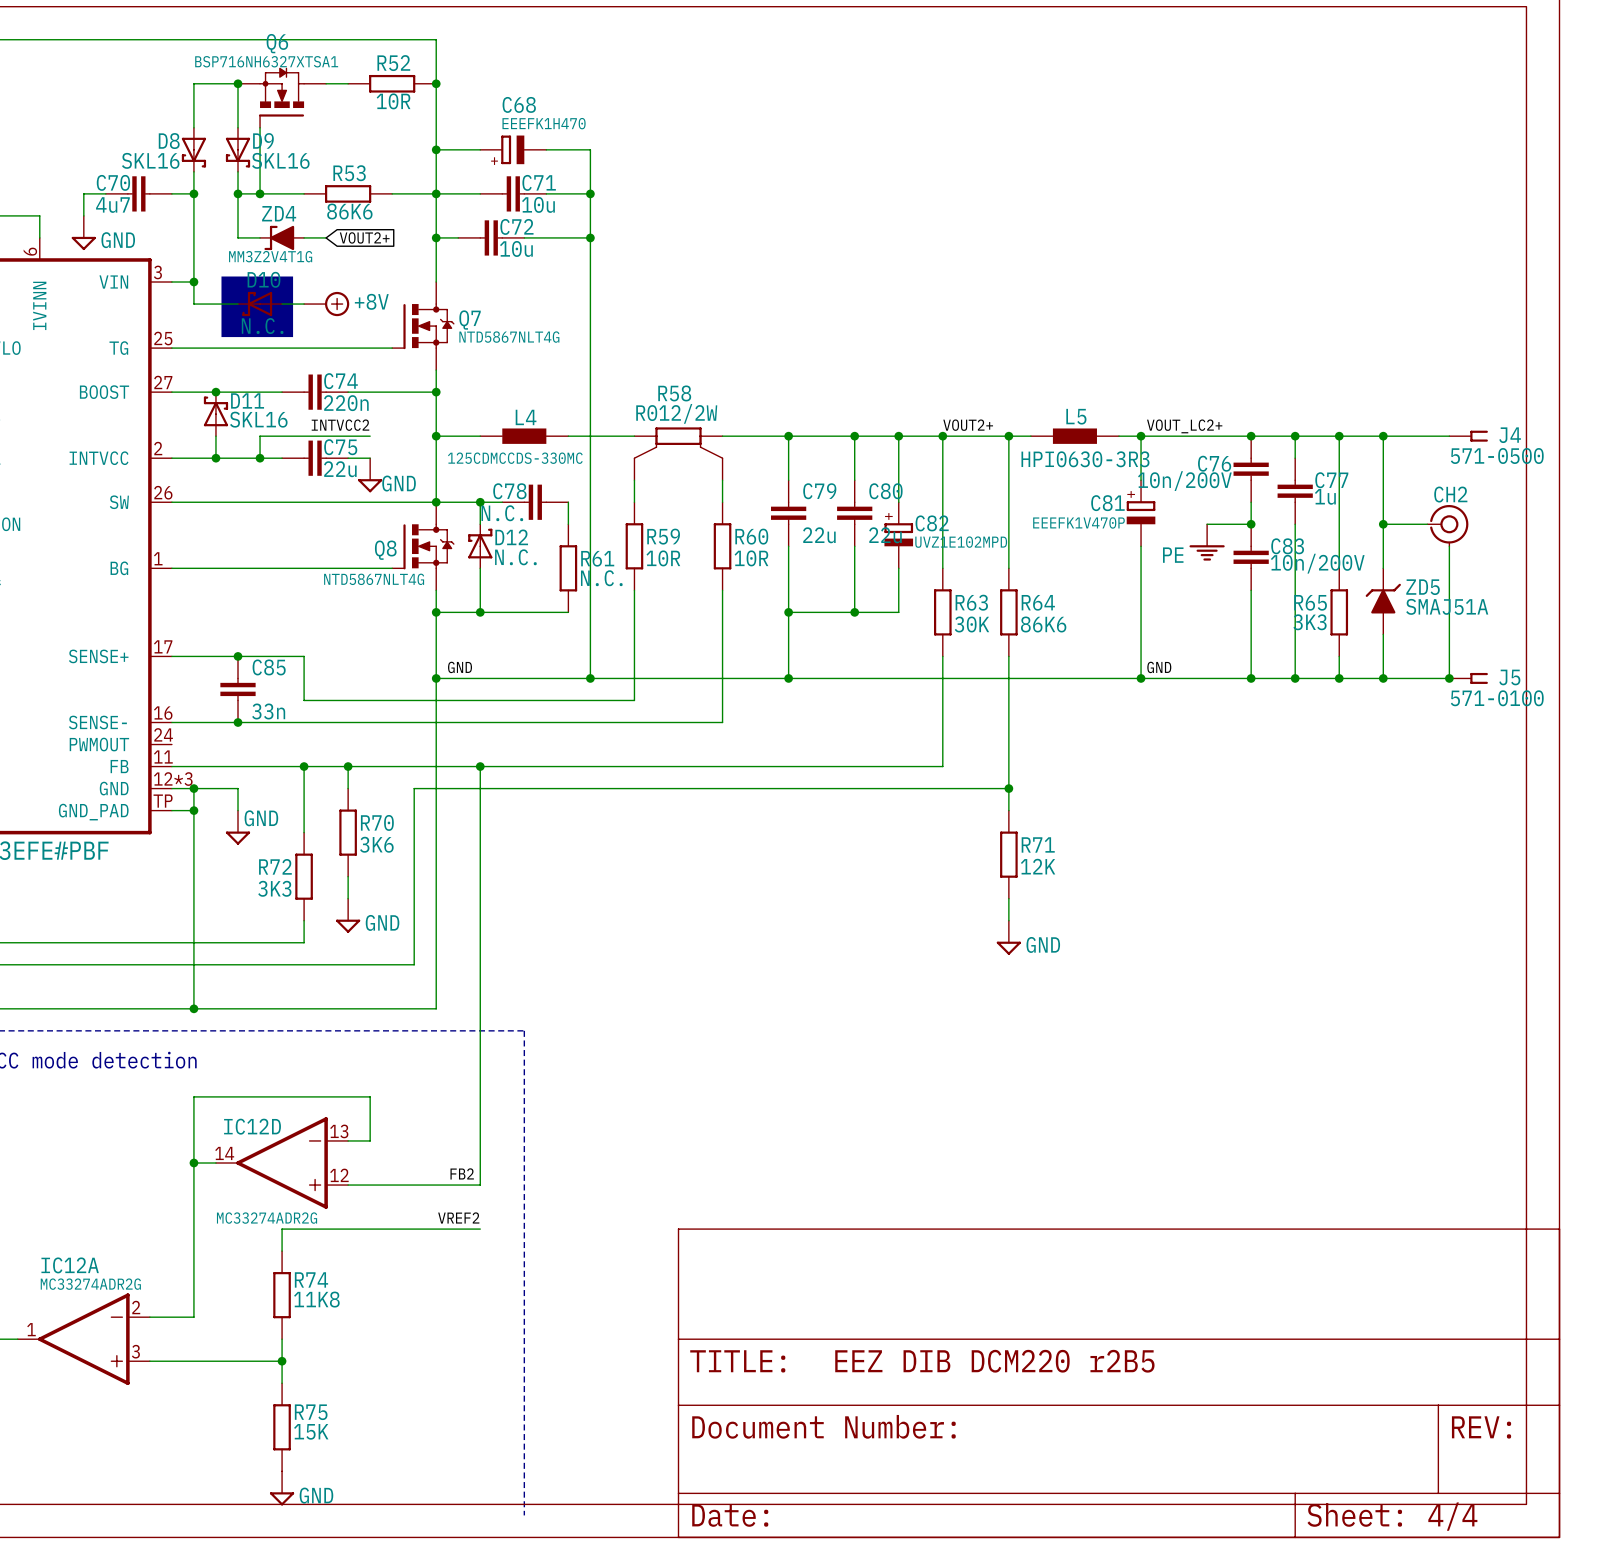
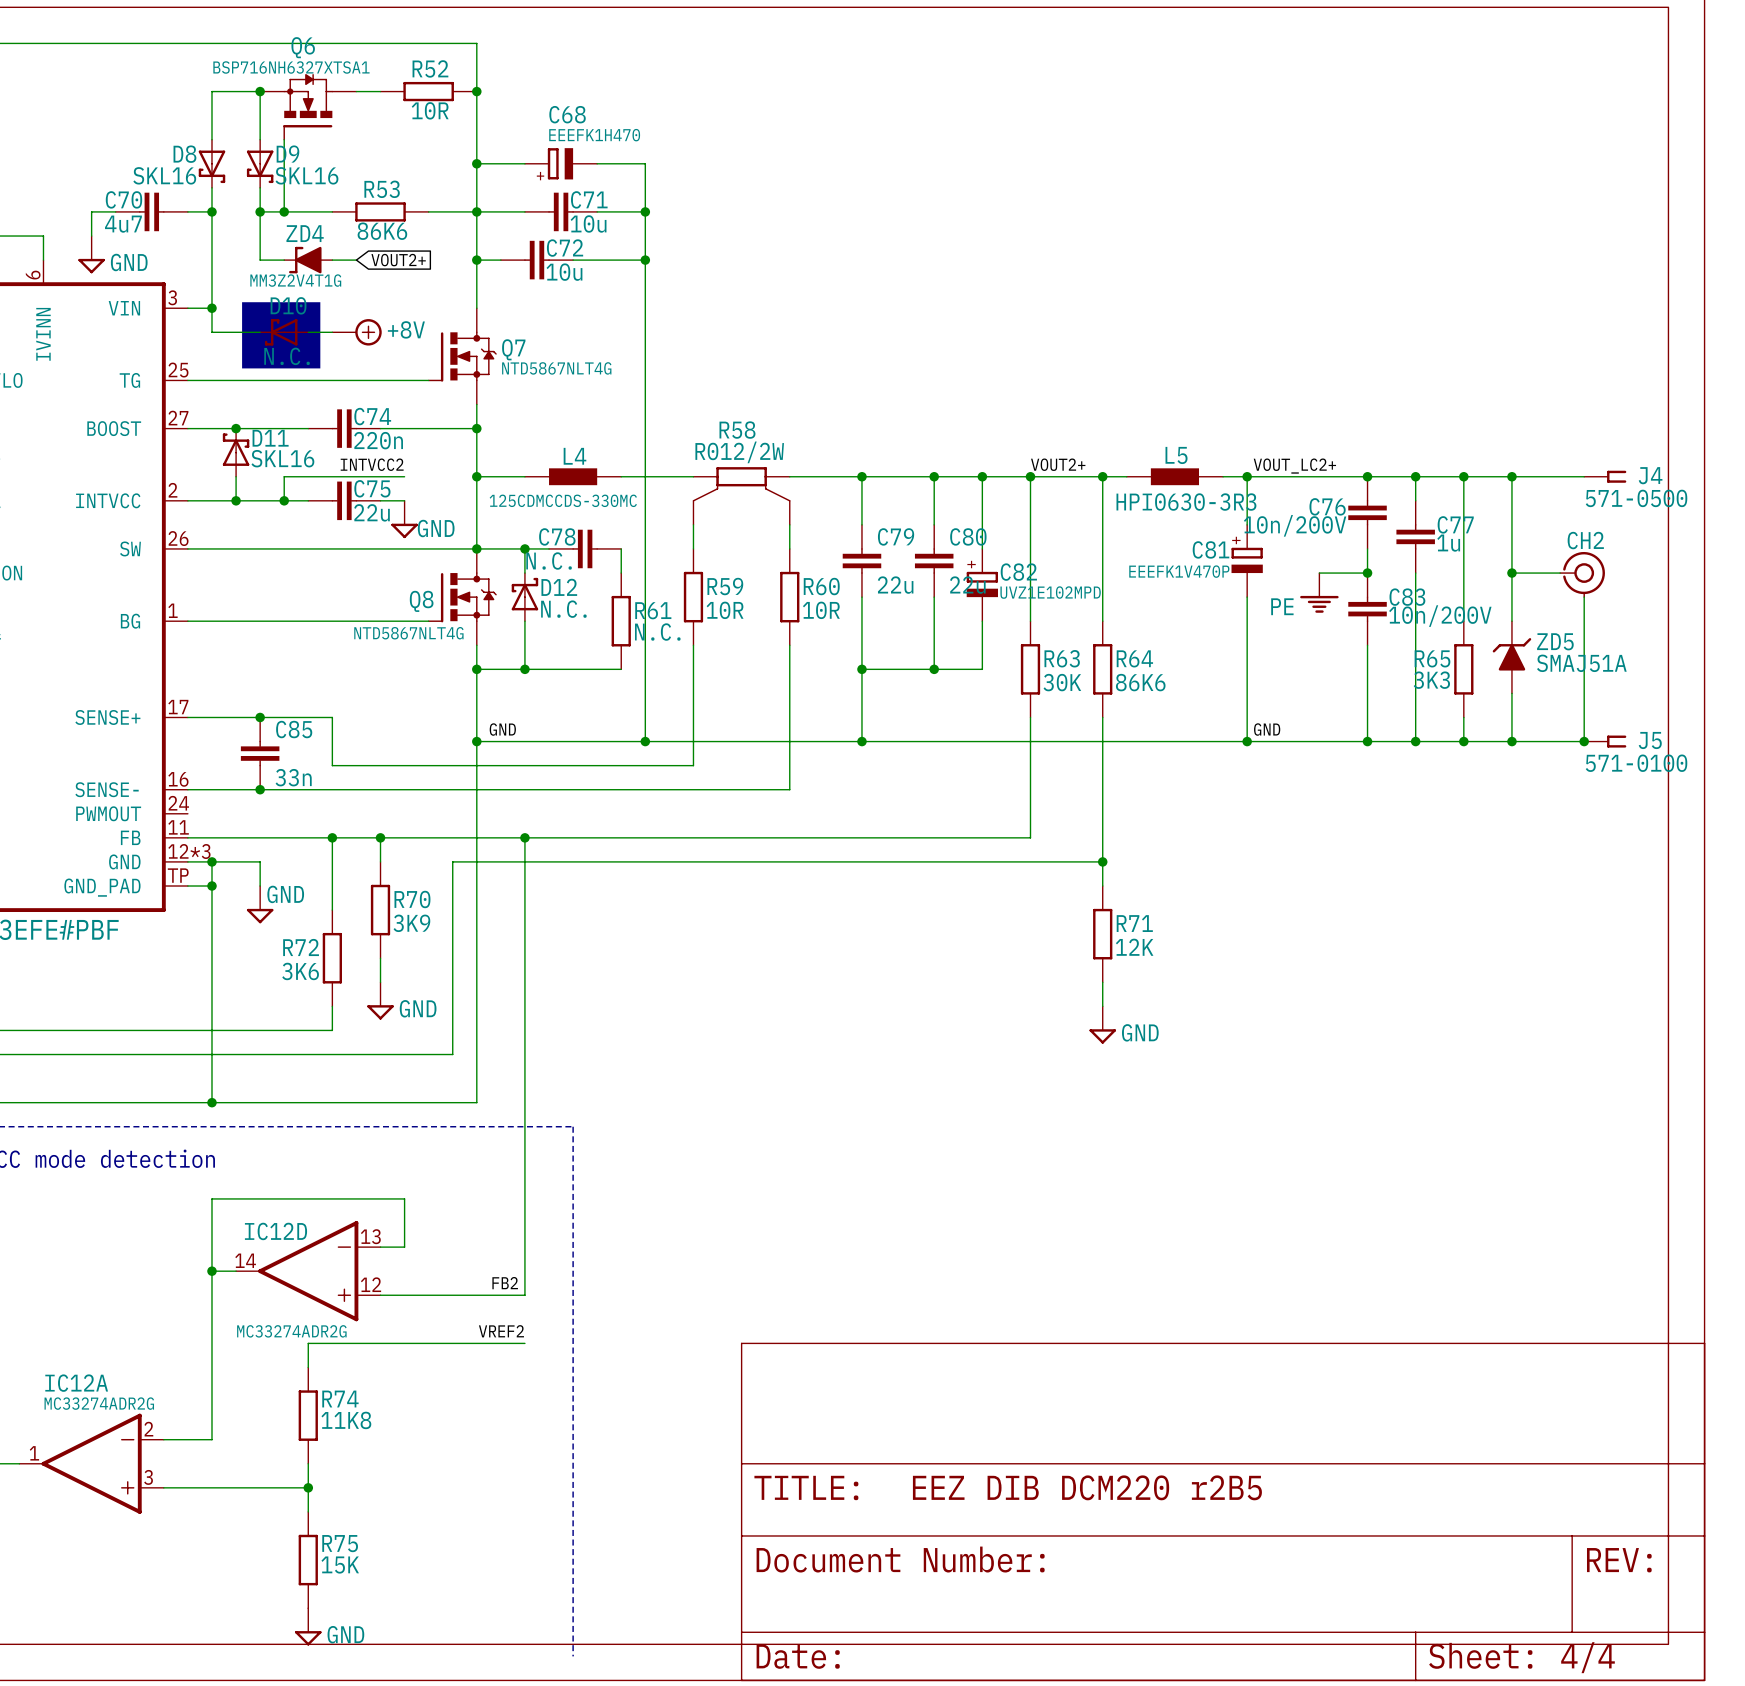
R70 value: 3K6 (376, 844) -> 3K9 (411, 923)
R72 value: 3K3 (274, 888) -> 3K6 (300, 971)

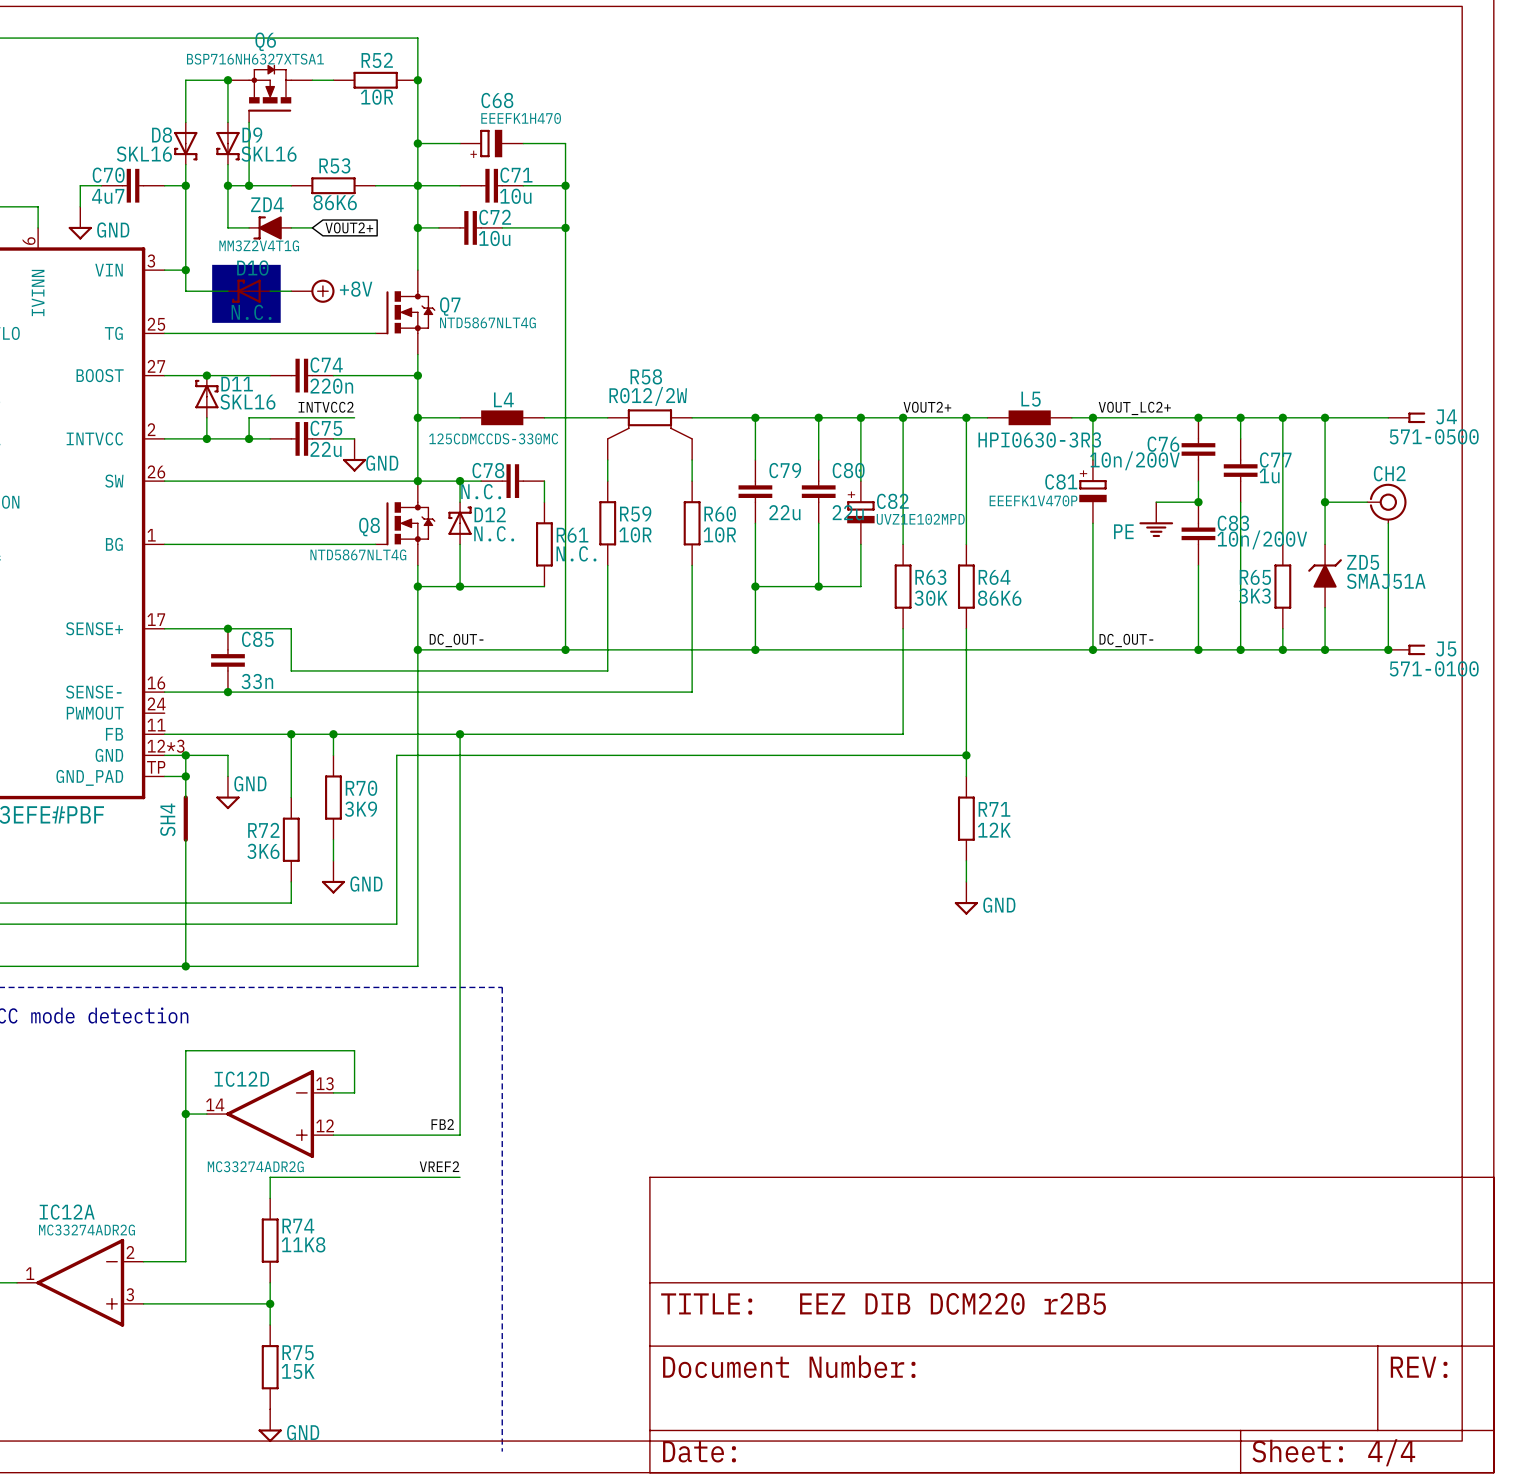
label: GND (502, 729) -> DC_OUT- (456, 640)
label: GND (1267, 729) -> DC_OUT- (1126, 640)
SH4: none -> (185, 818)

